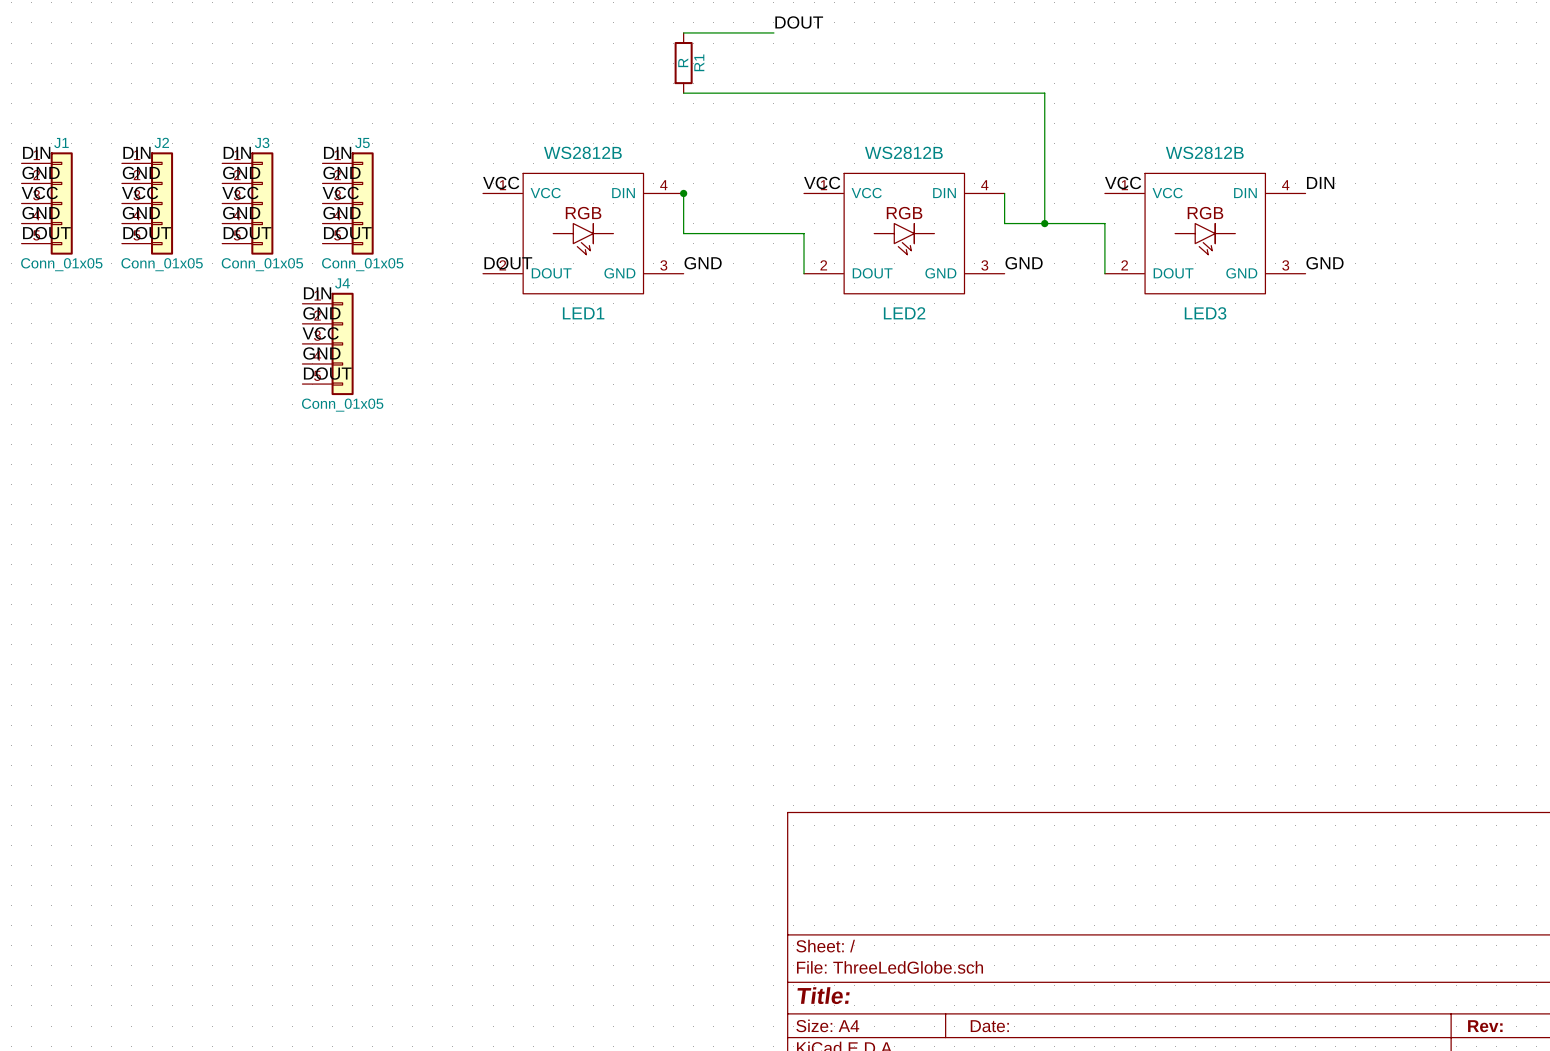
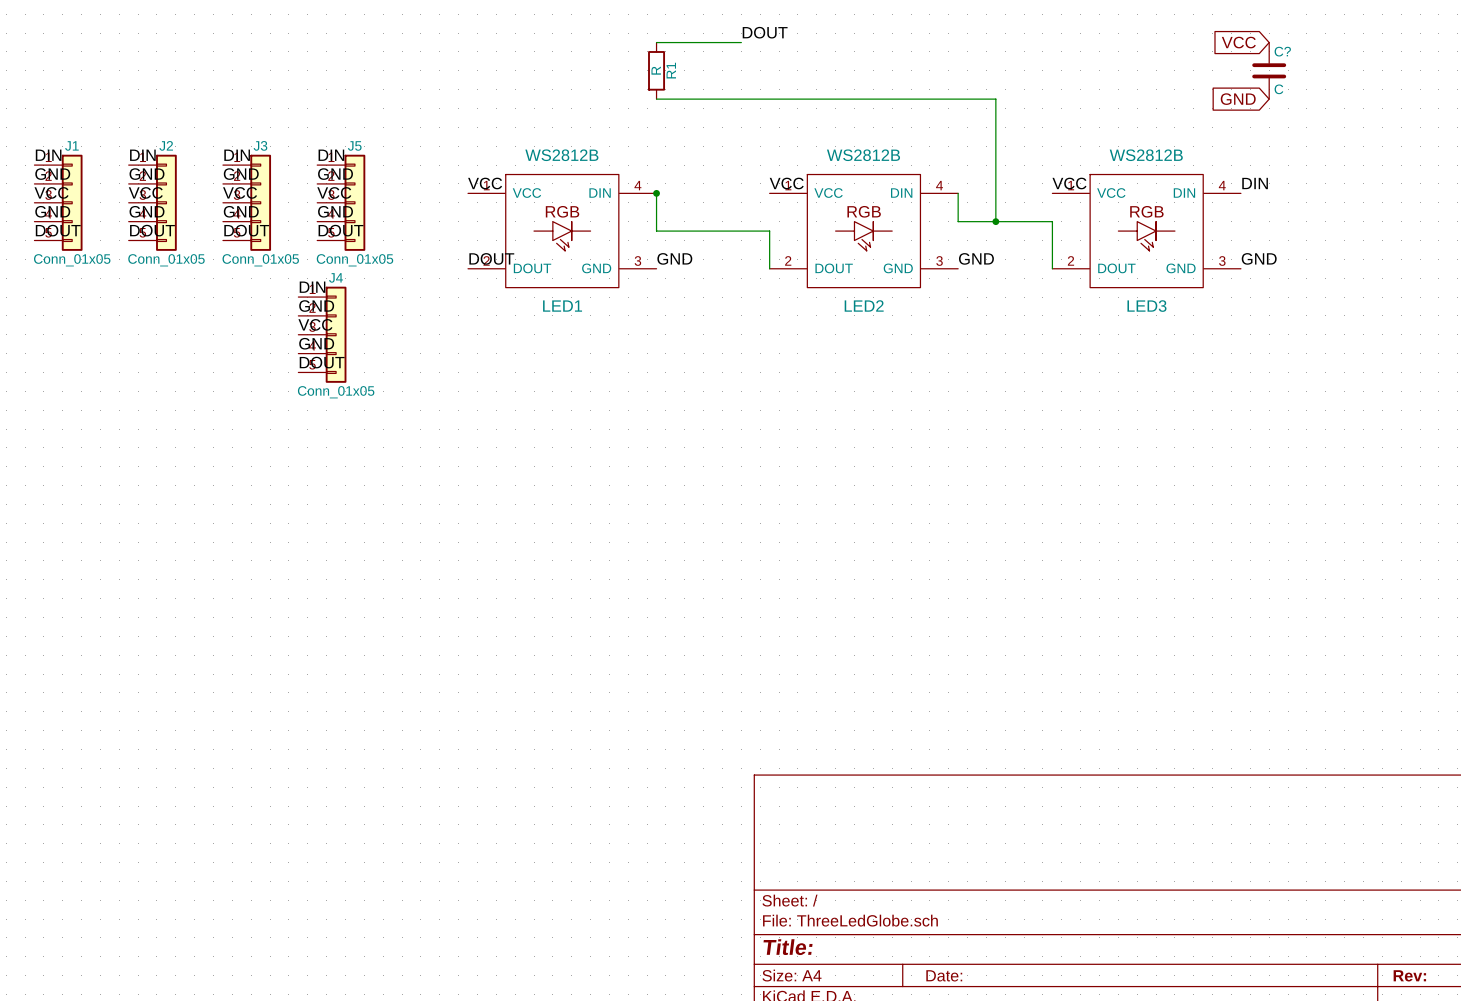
global label: none -> VCC (1238, 42)
C?: none -> C (1269, 70)
global label: none -> GND (1238, 99)

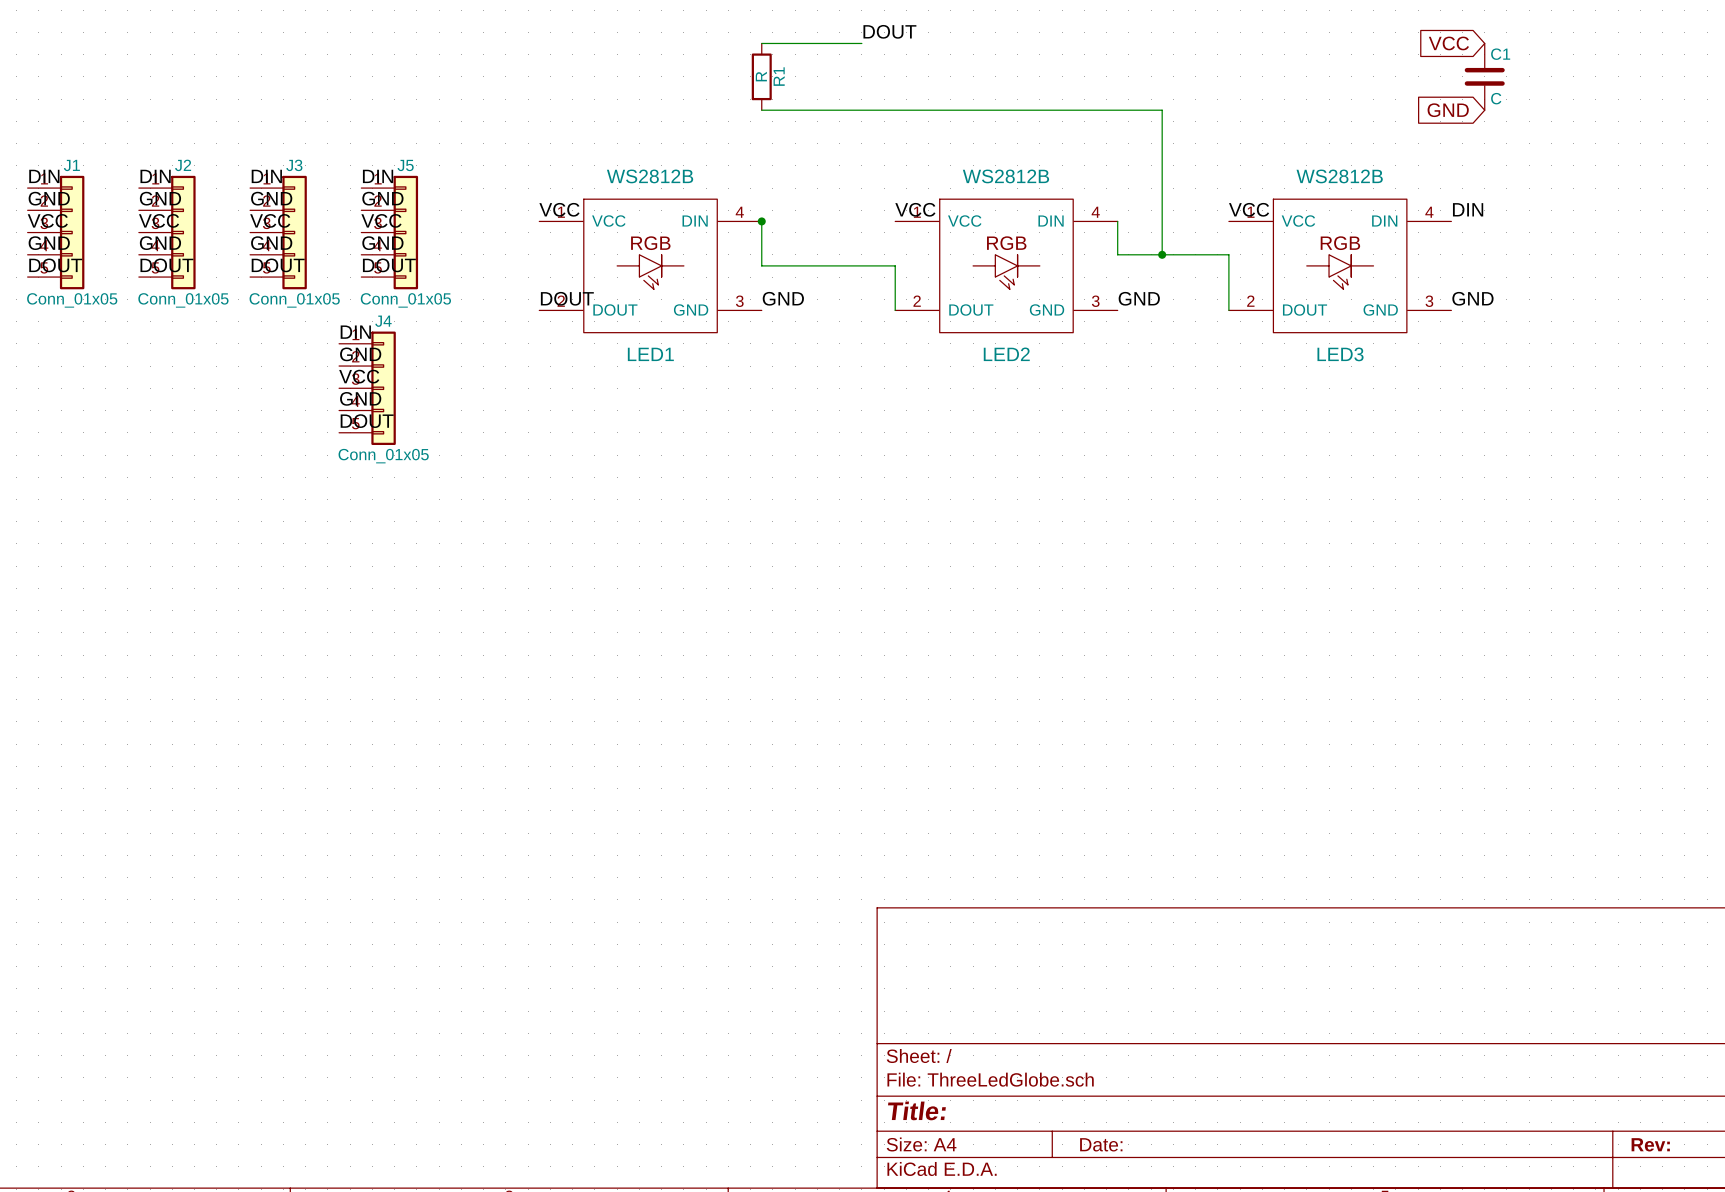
C? name: C? (1282, 51) -> C1 (1500, 54)

